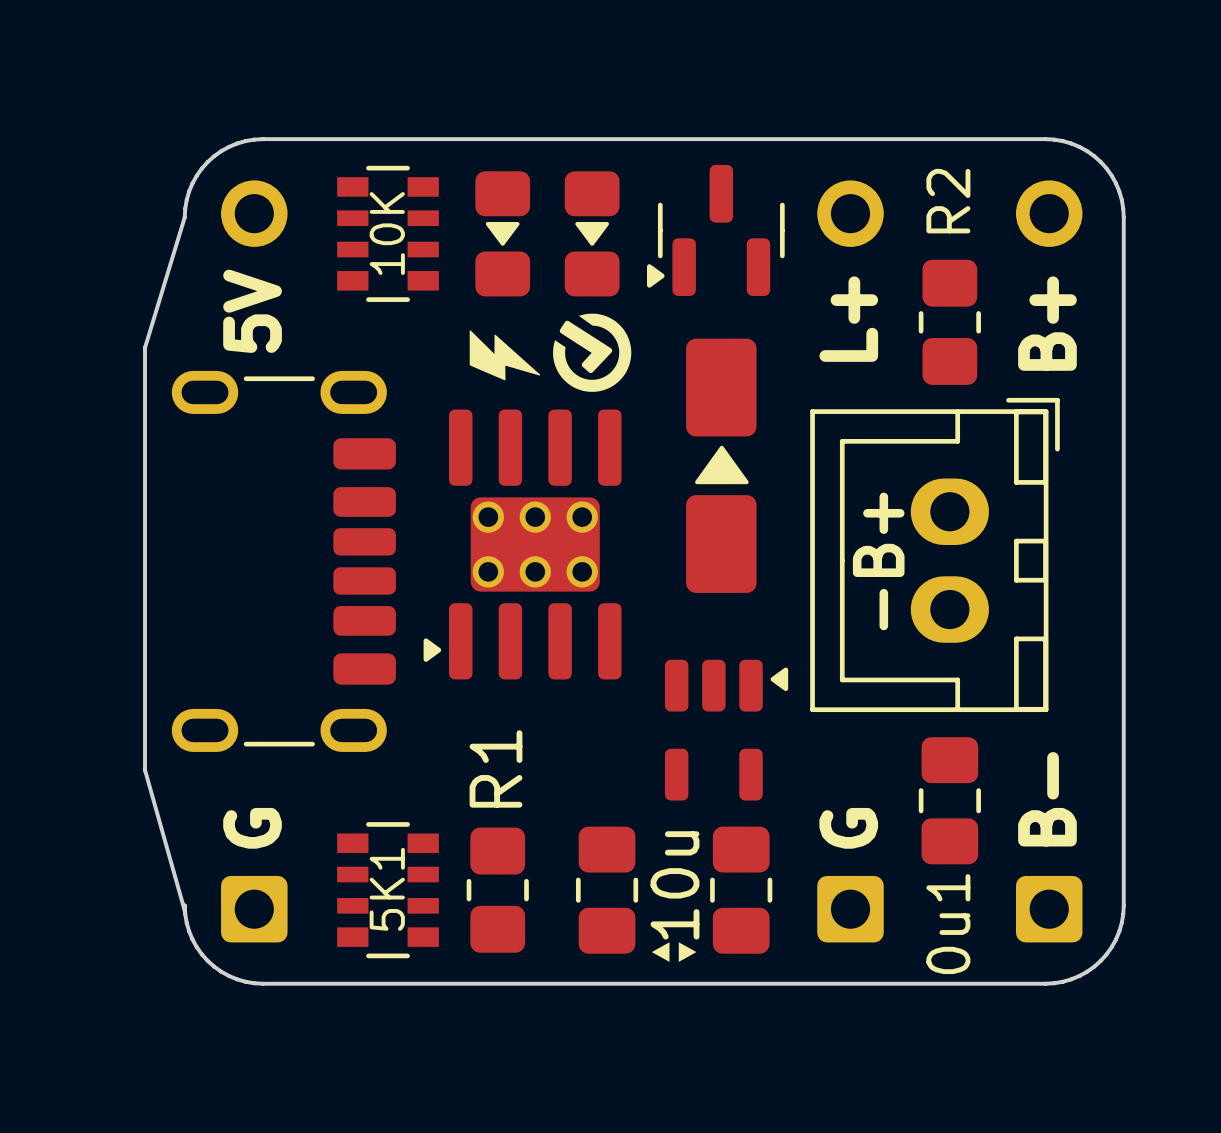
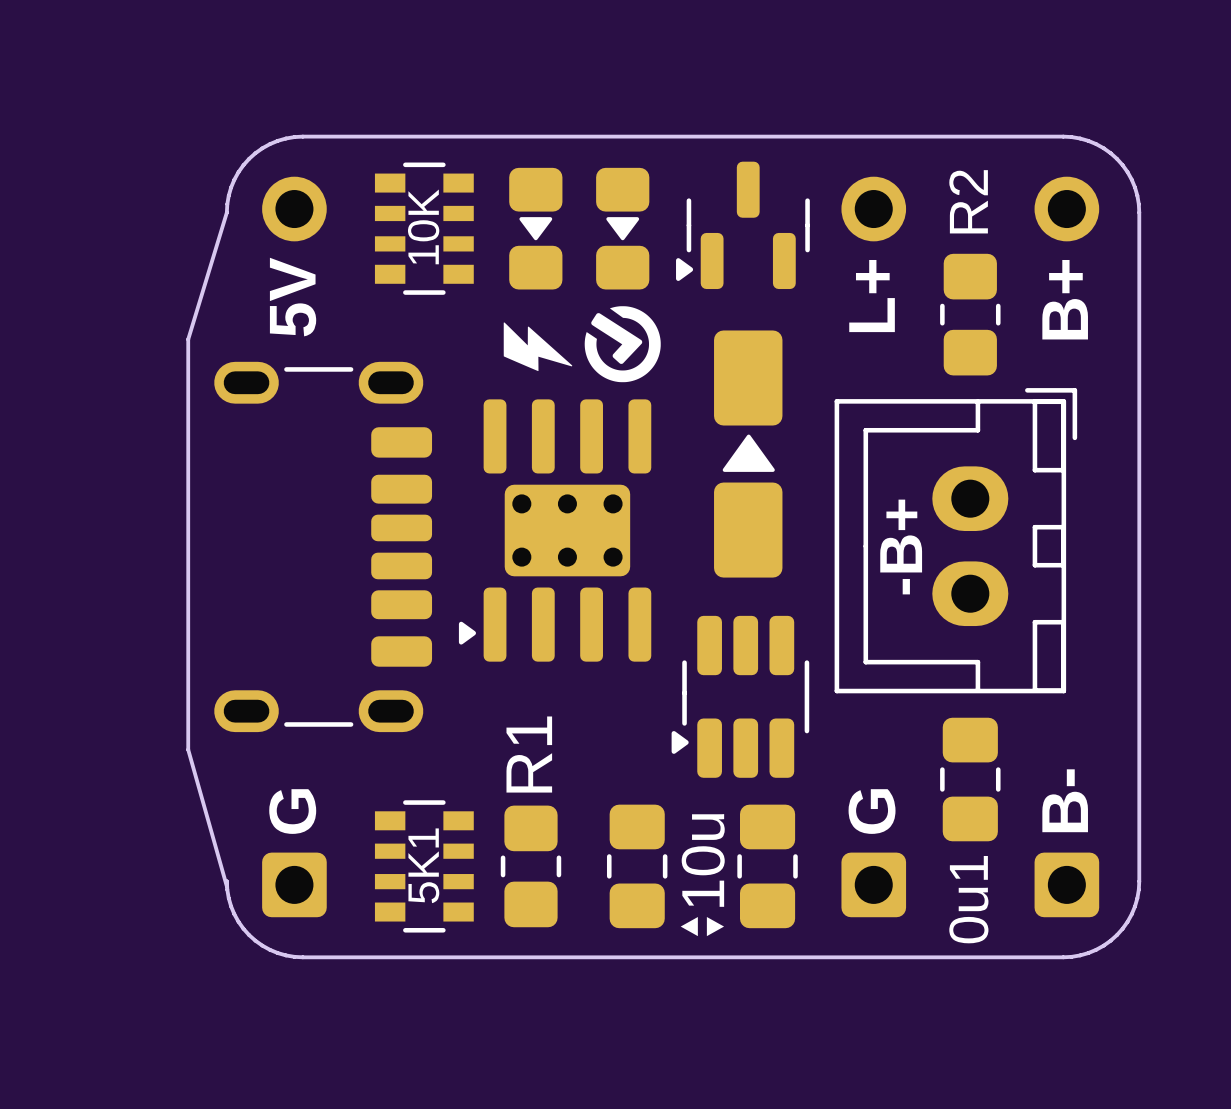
part footprint: [664, 659, 789, 801] -> [671, 615, 810, 778]

